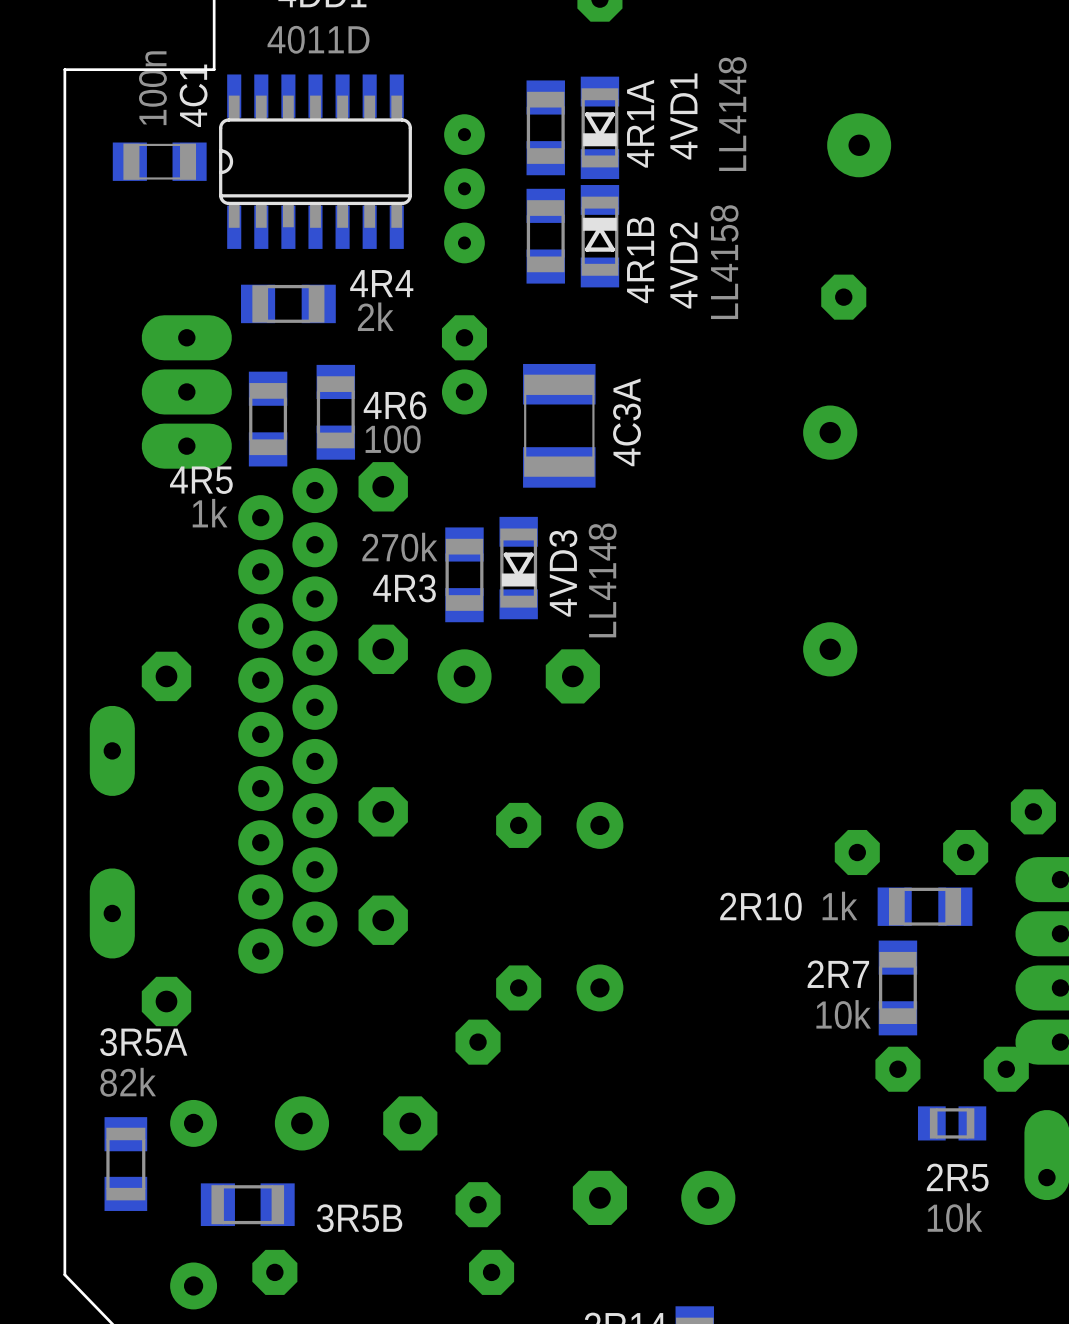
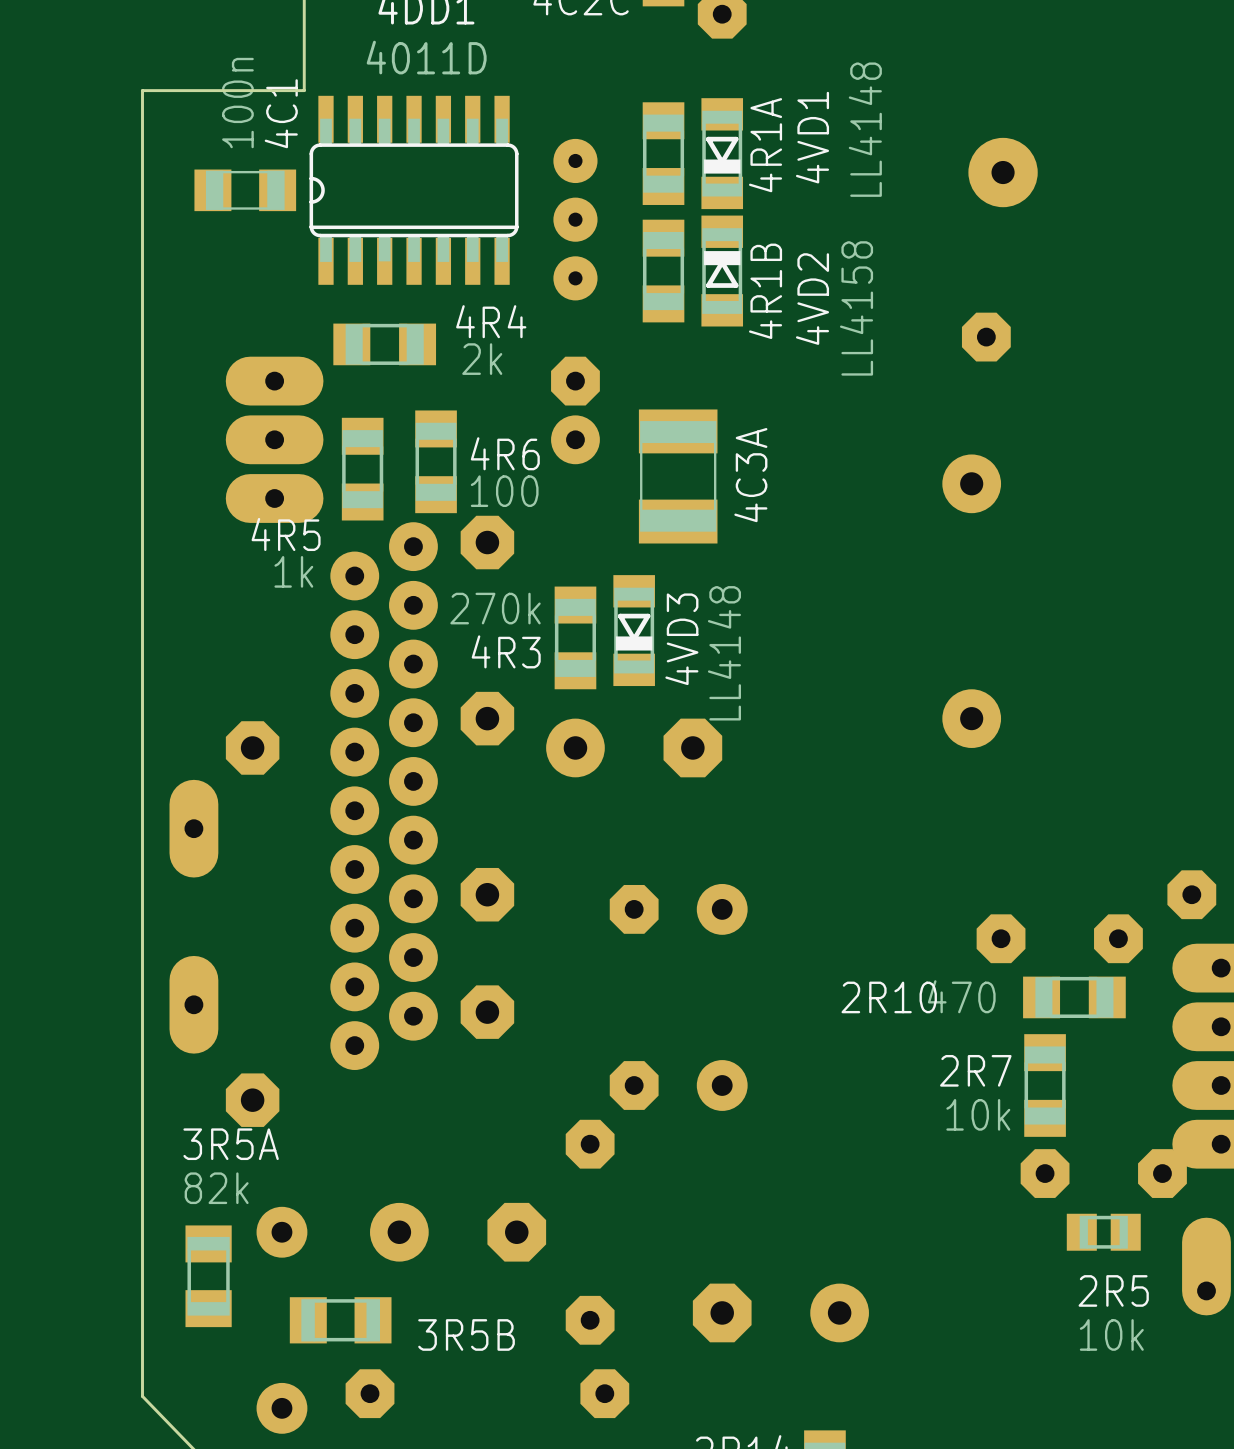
2R10 value: 1k (839, 905) -> 470 (961, 996)

